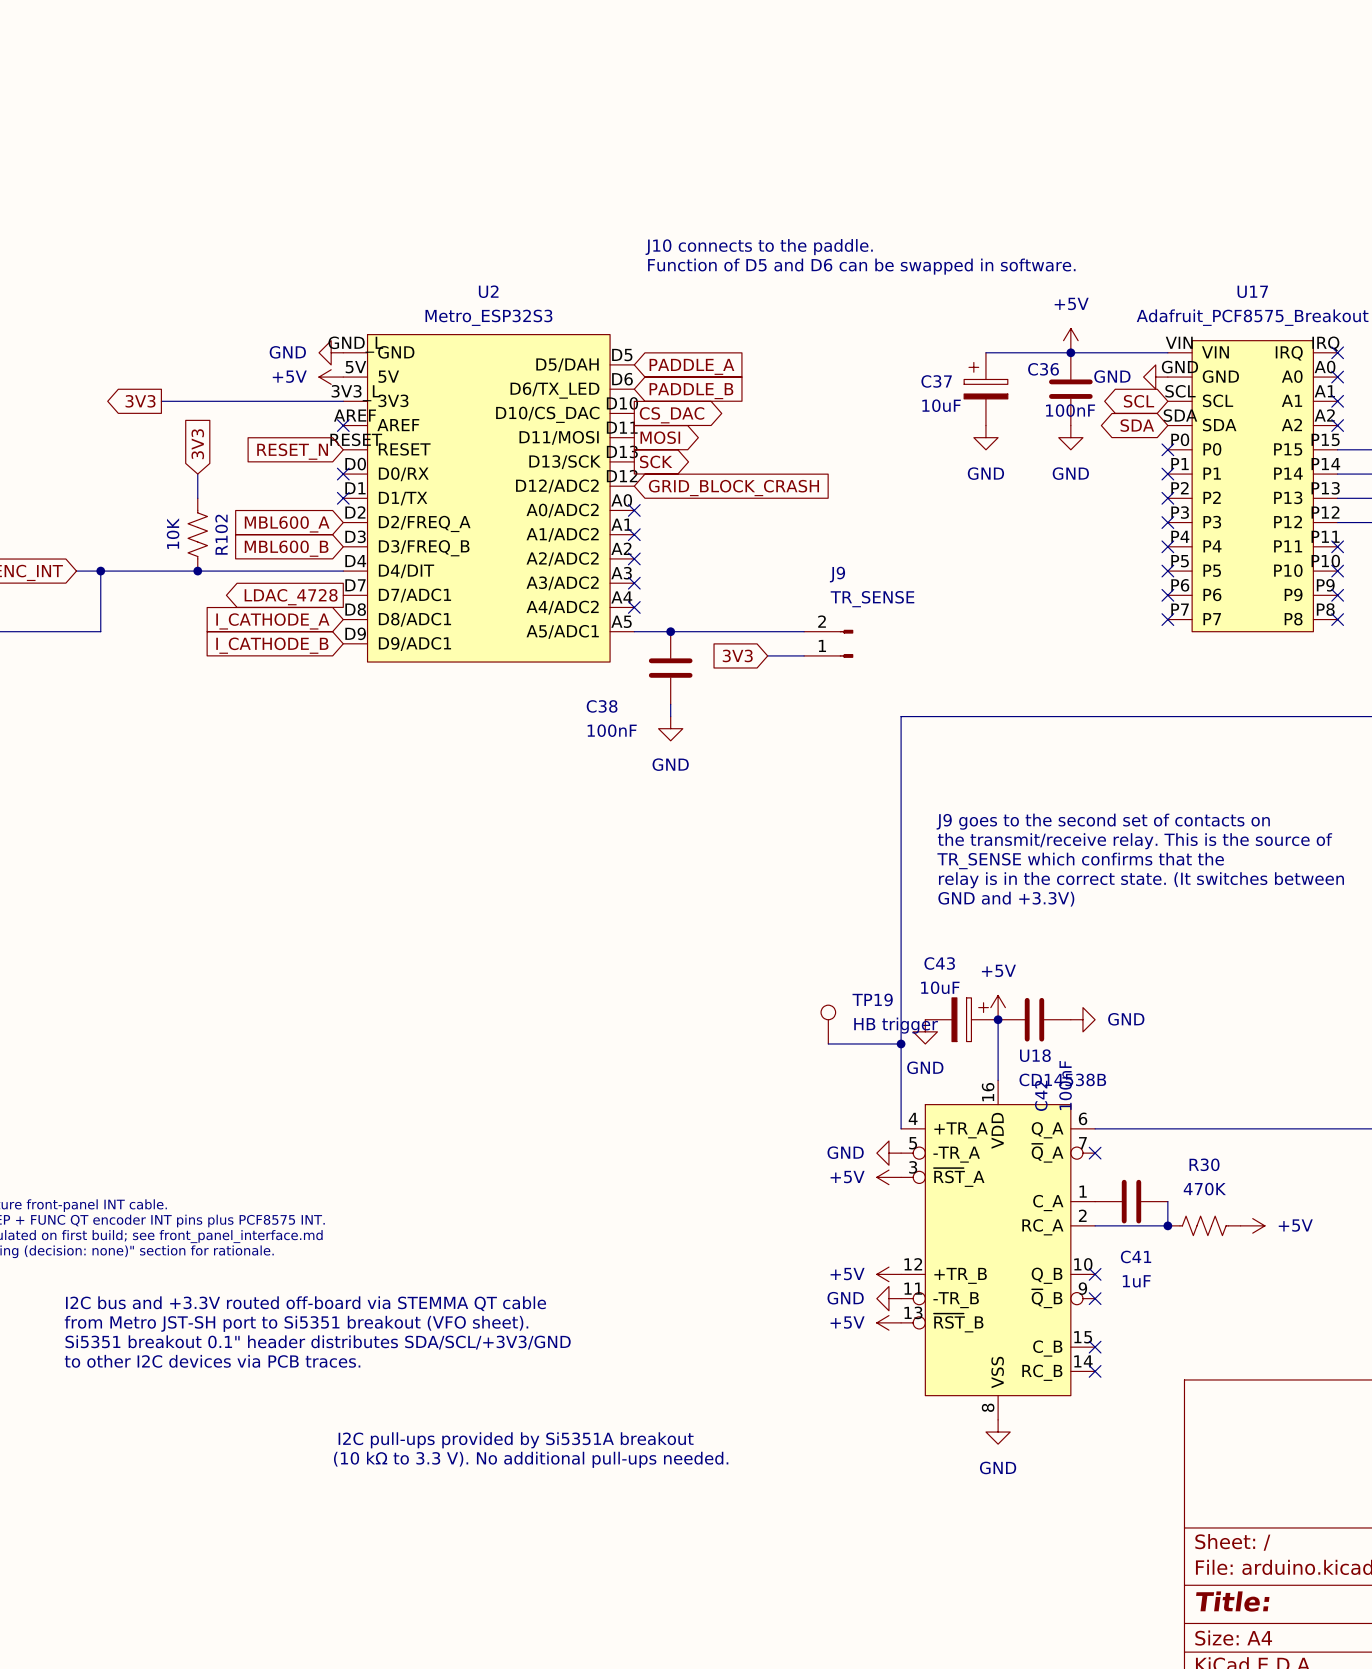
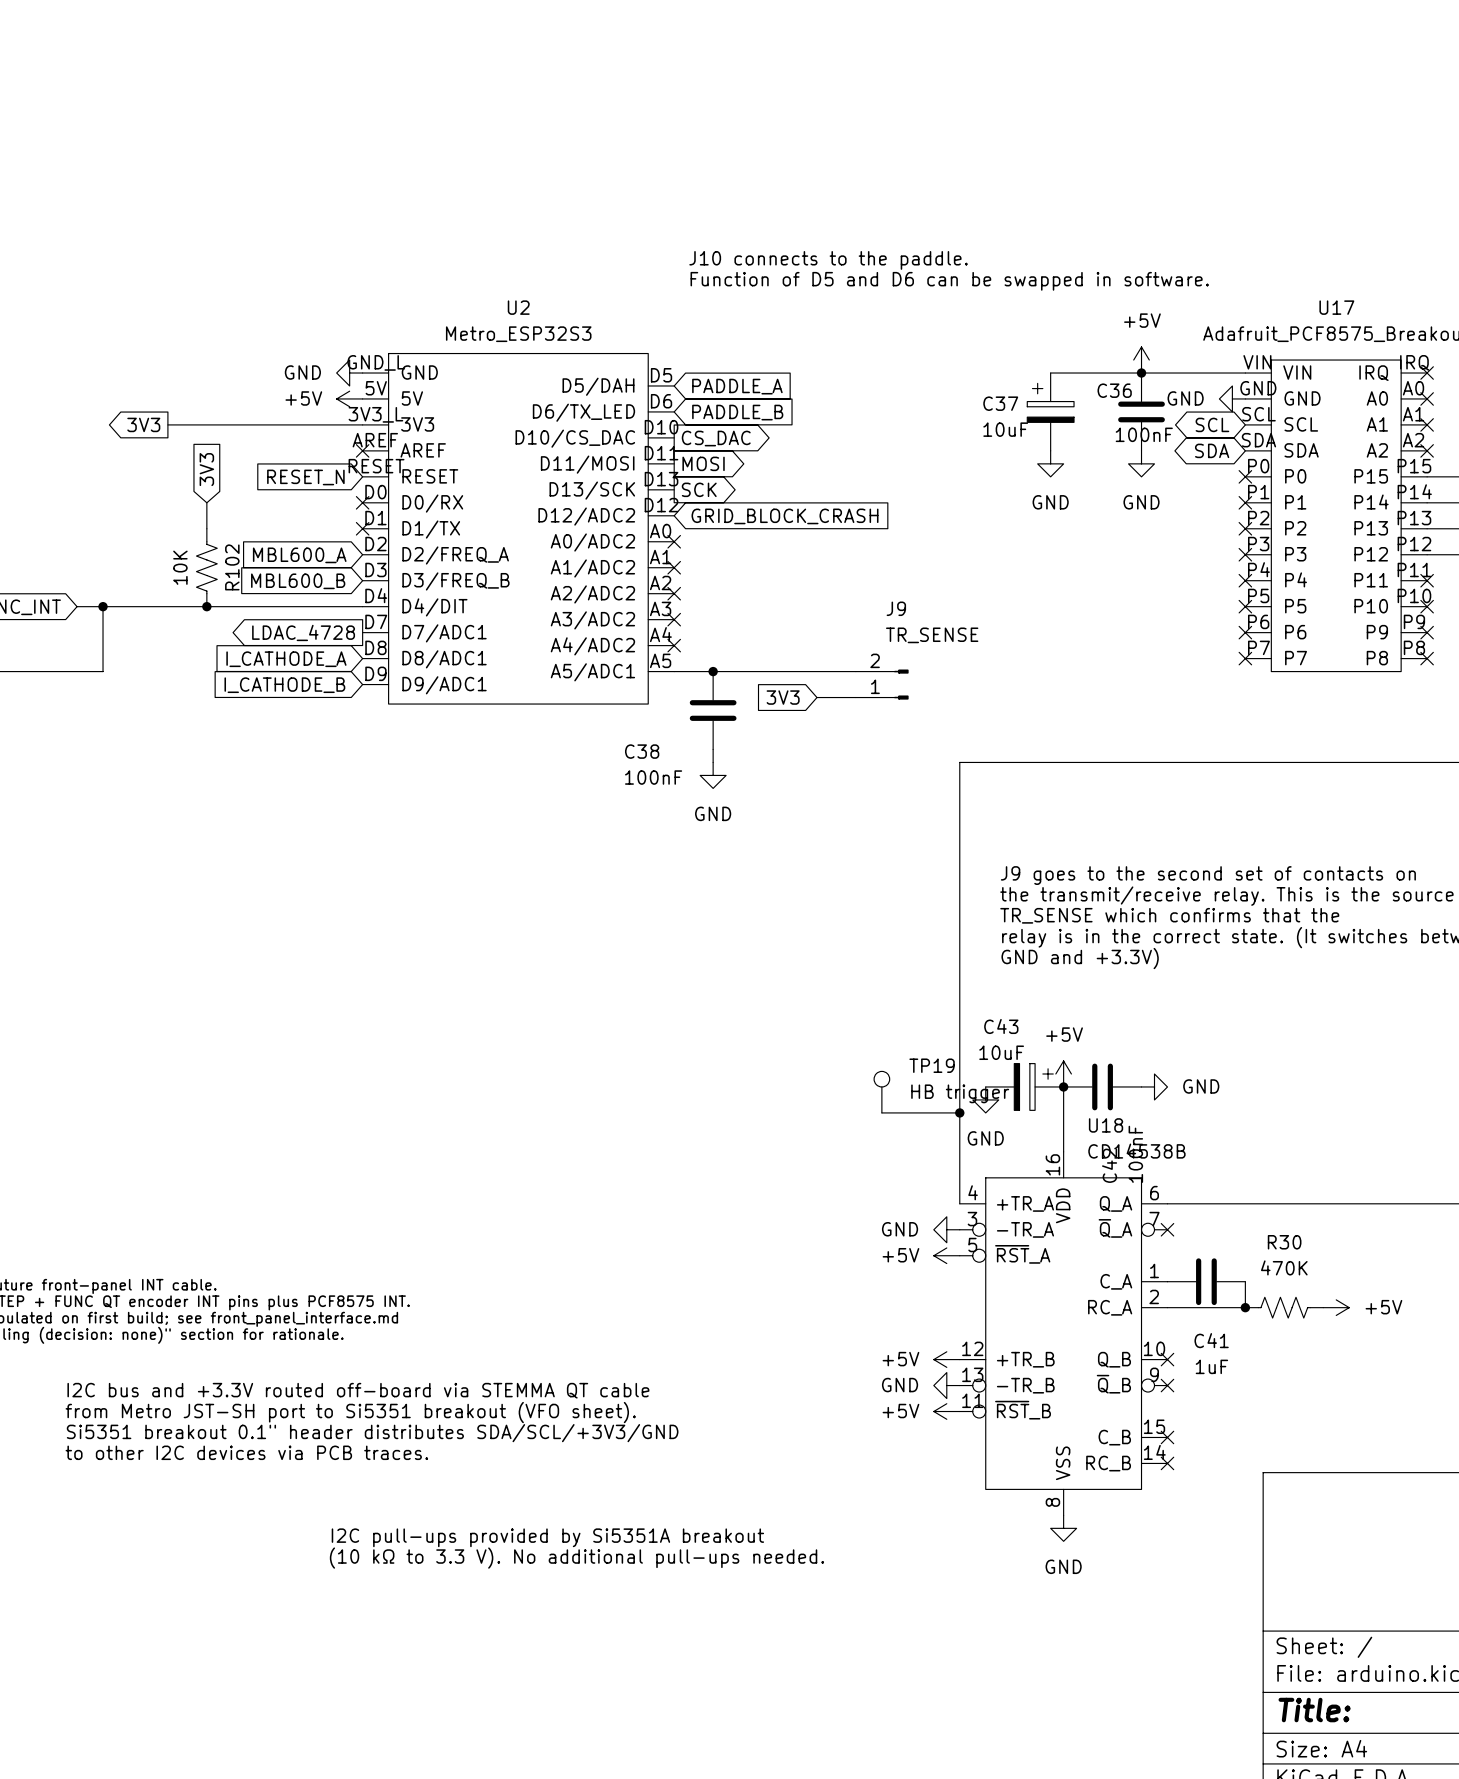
U18 pin number: 5 (913, 1143) -> 3 (972, 1219)
U18 pin number: 3 (913, 1167) -> 5 (972, 1245)
U18 pin number: 11 (913, 1288) -> 13 (972, 1374)
U18 pin number: 13 (913, 1312) -> 11 (972, 1400)

